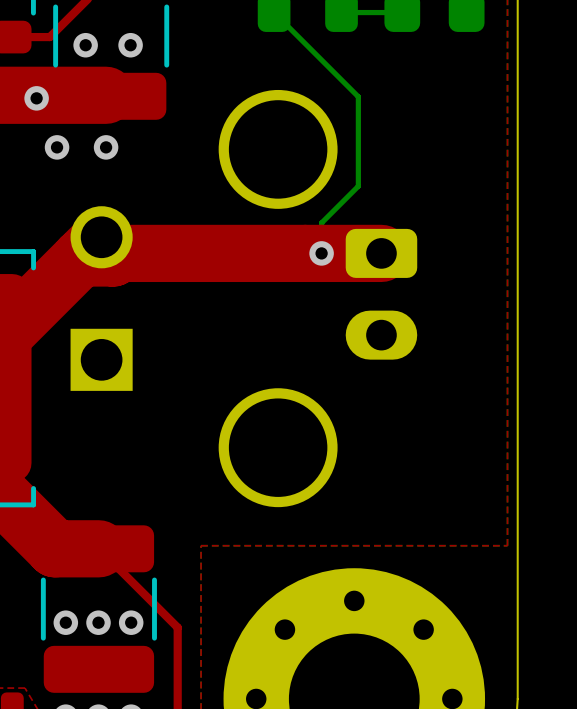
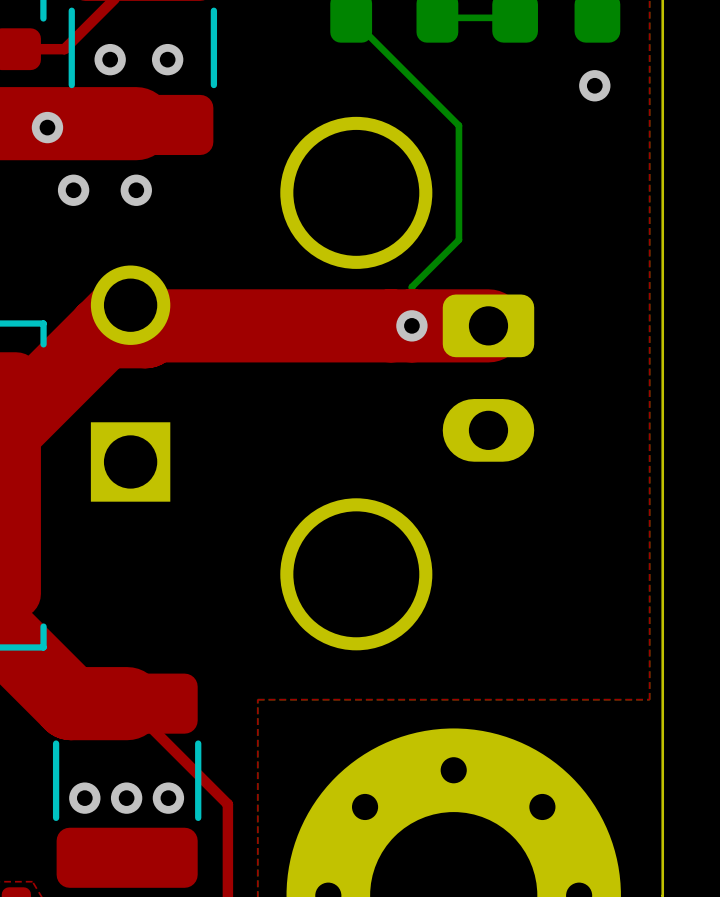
via: none -> (594, 85)

